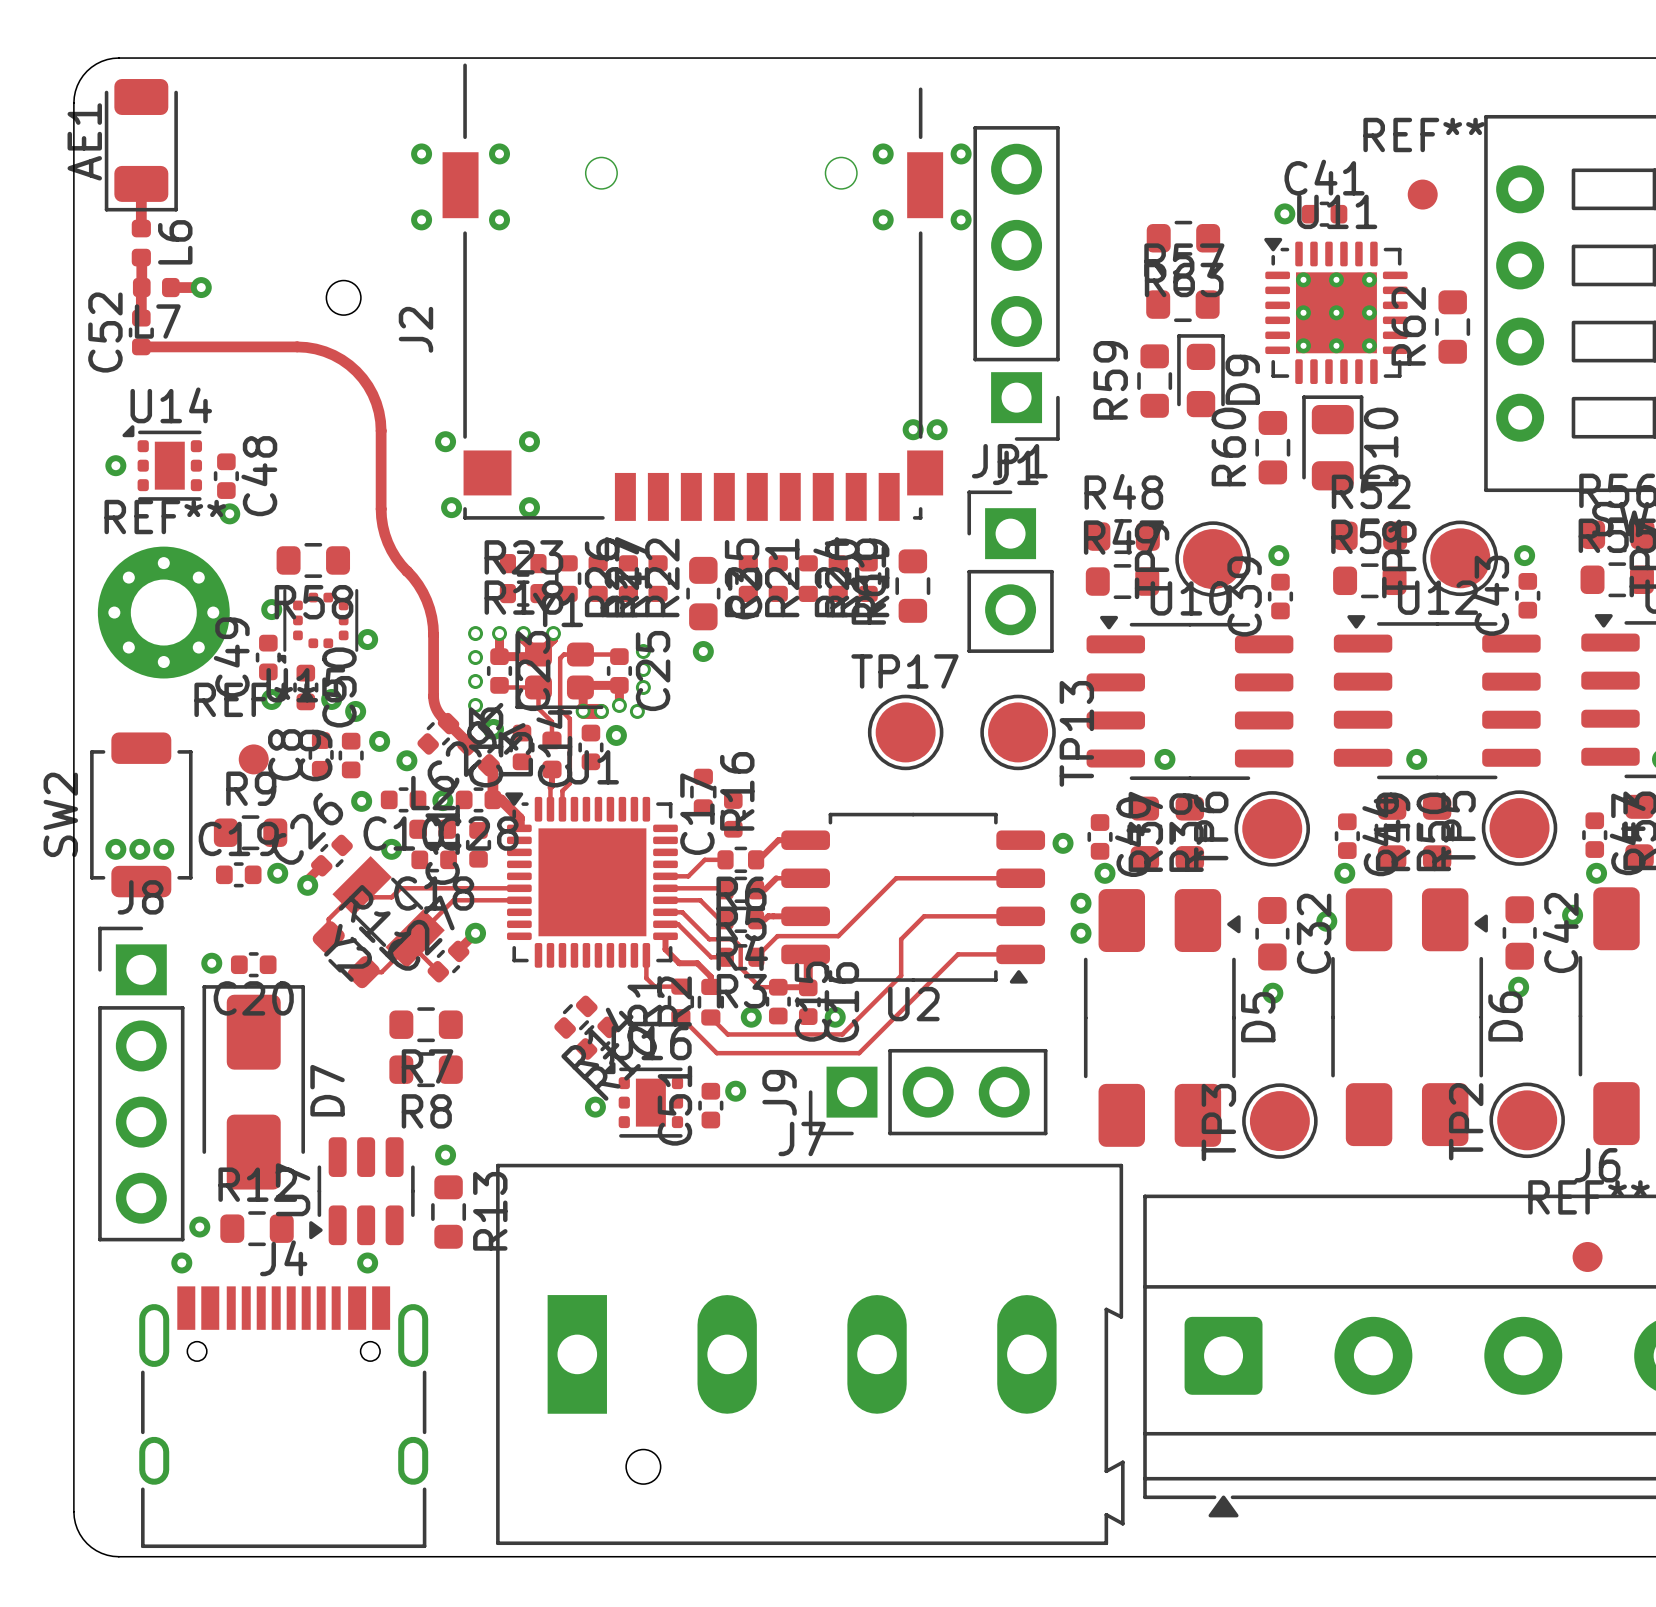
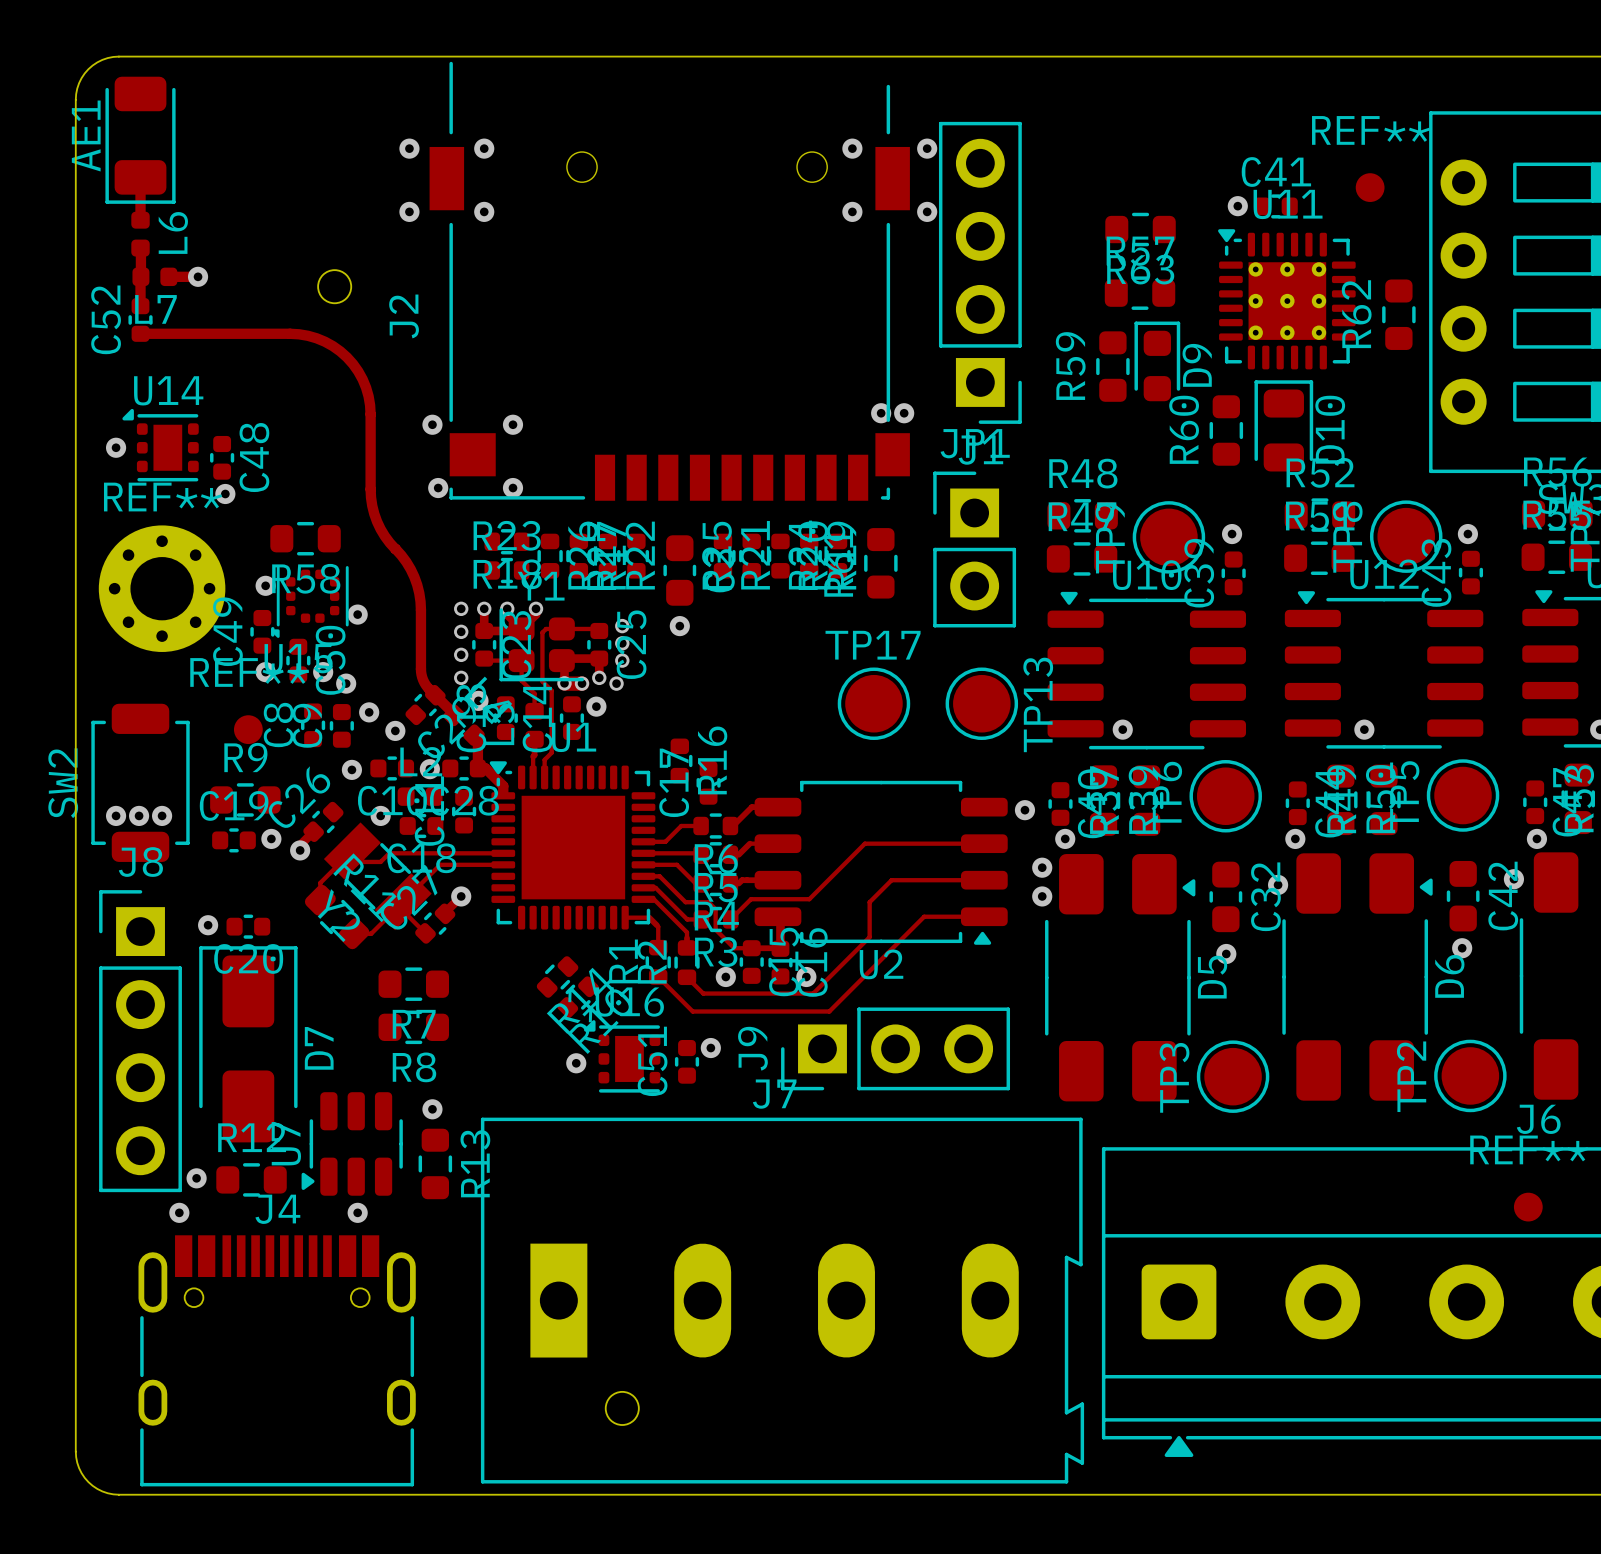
track: (665, 936) (665, 949) (671, 955) -> (625, 917) (649, 917)
track: (646, 955) (646, 978) (654, 986) (680, 986) -> (656, 925) (658, 947)
track: (679, 963) (697, 963) (710, 976) -> (643, 899) (653, 899) (687, 932) (687, 938)

